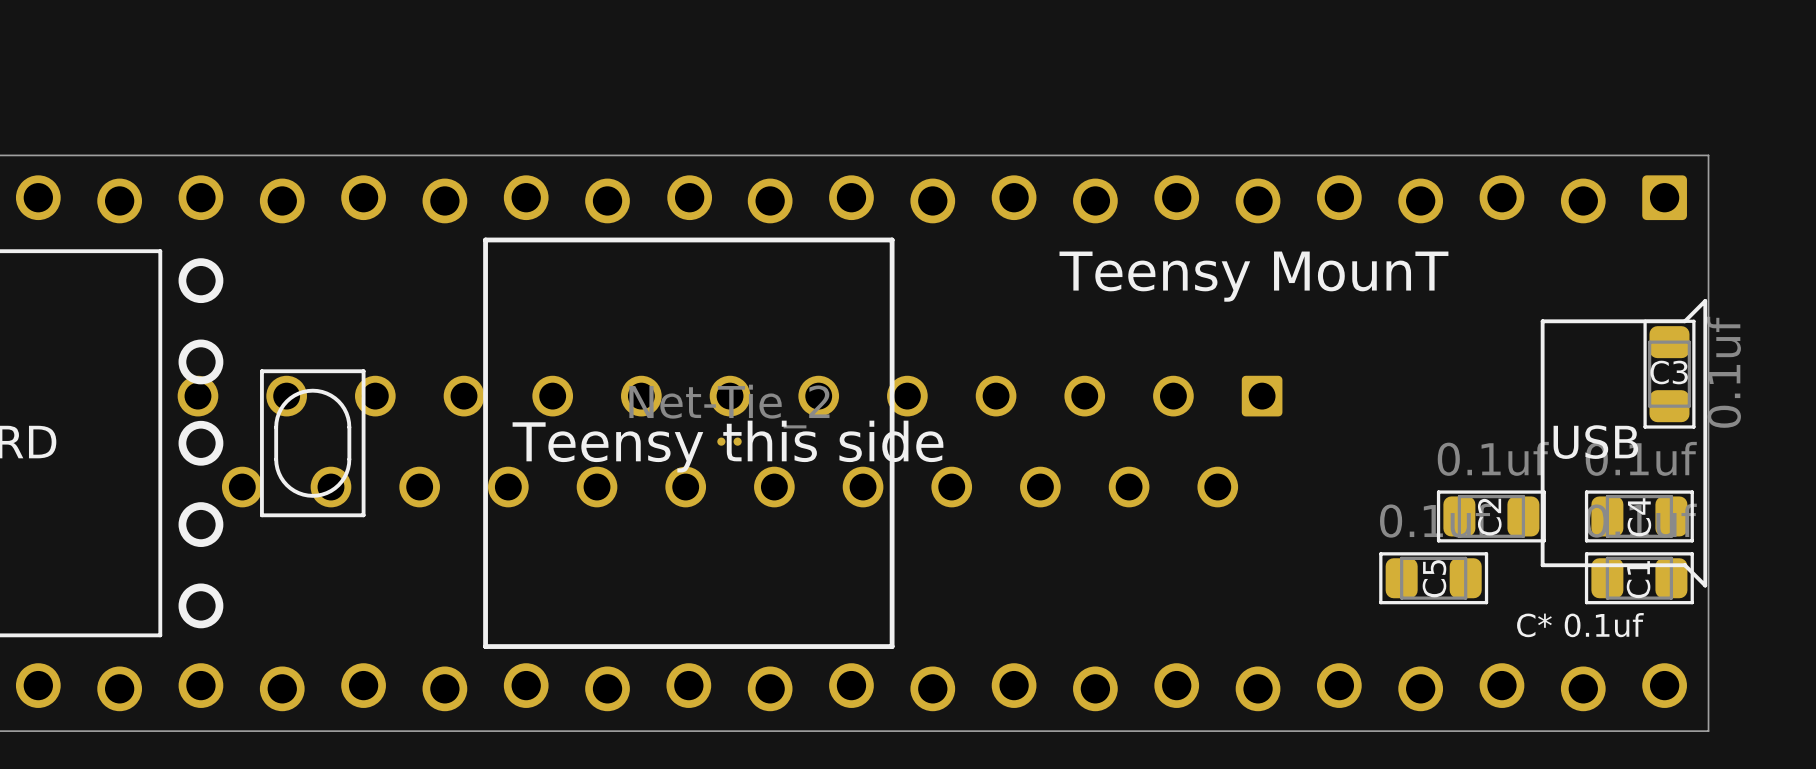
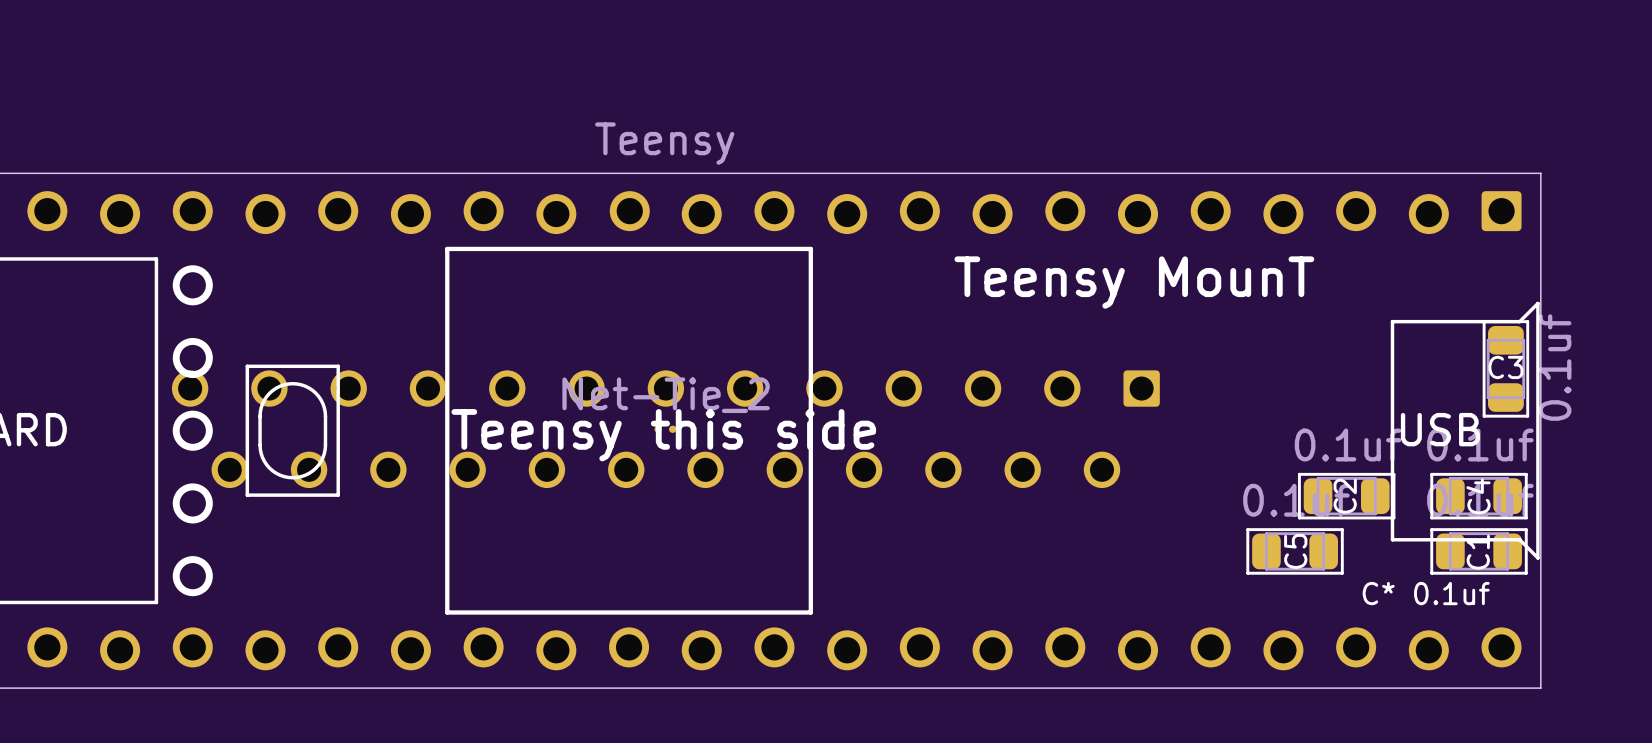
part value: none -> Teensy (664, 143)

